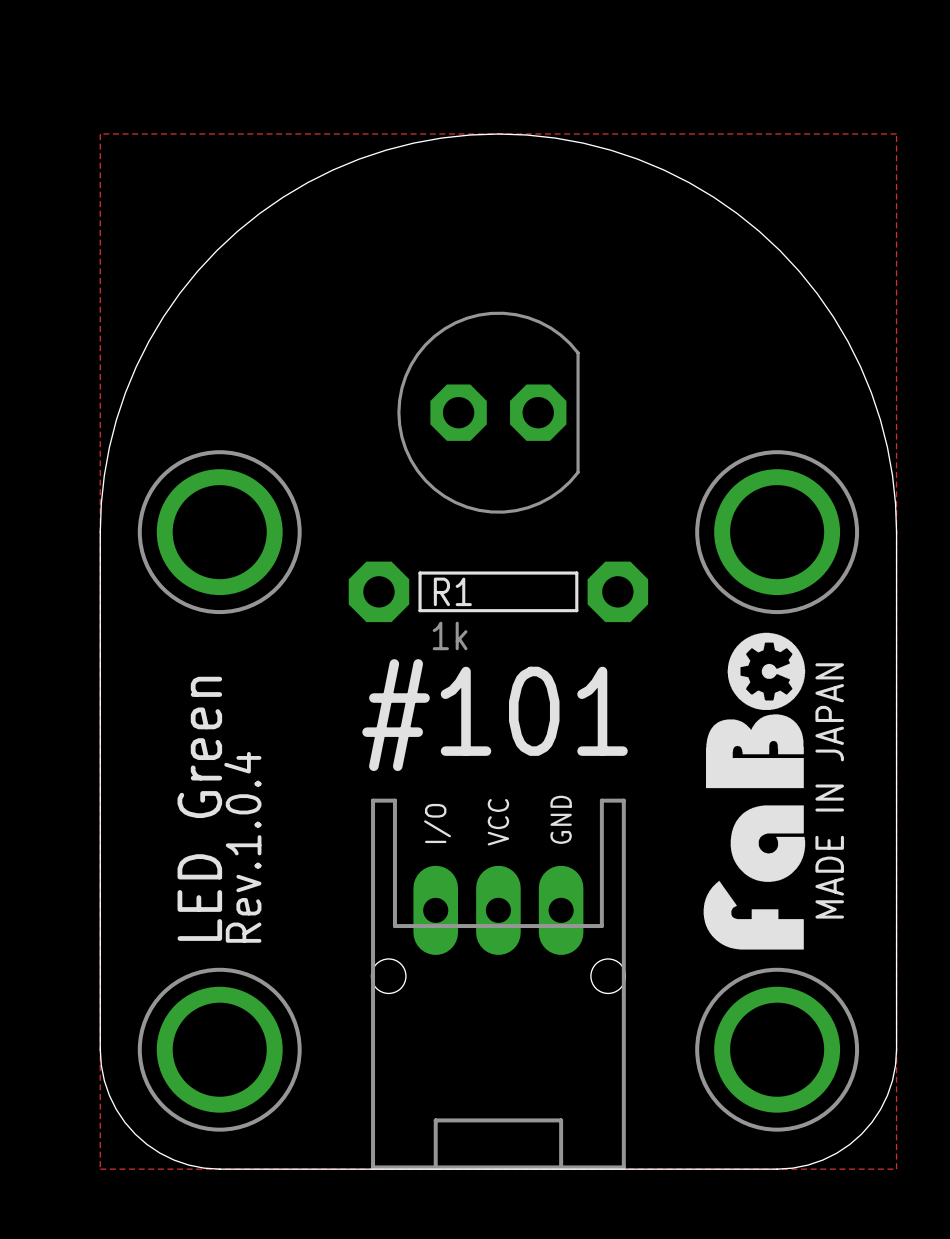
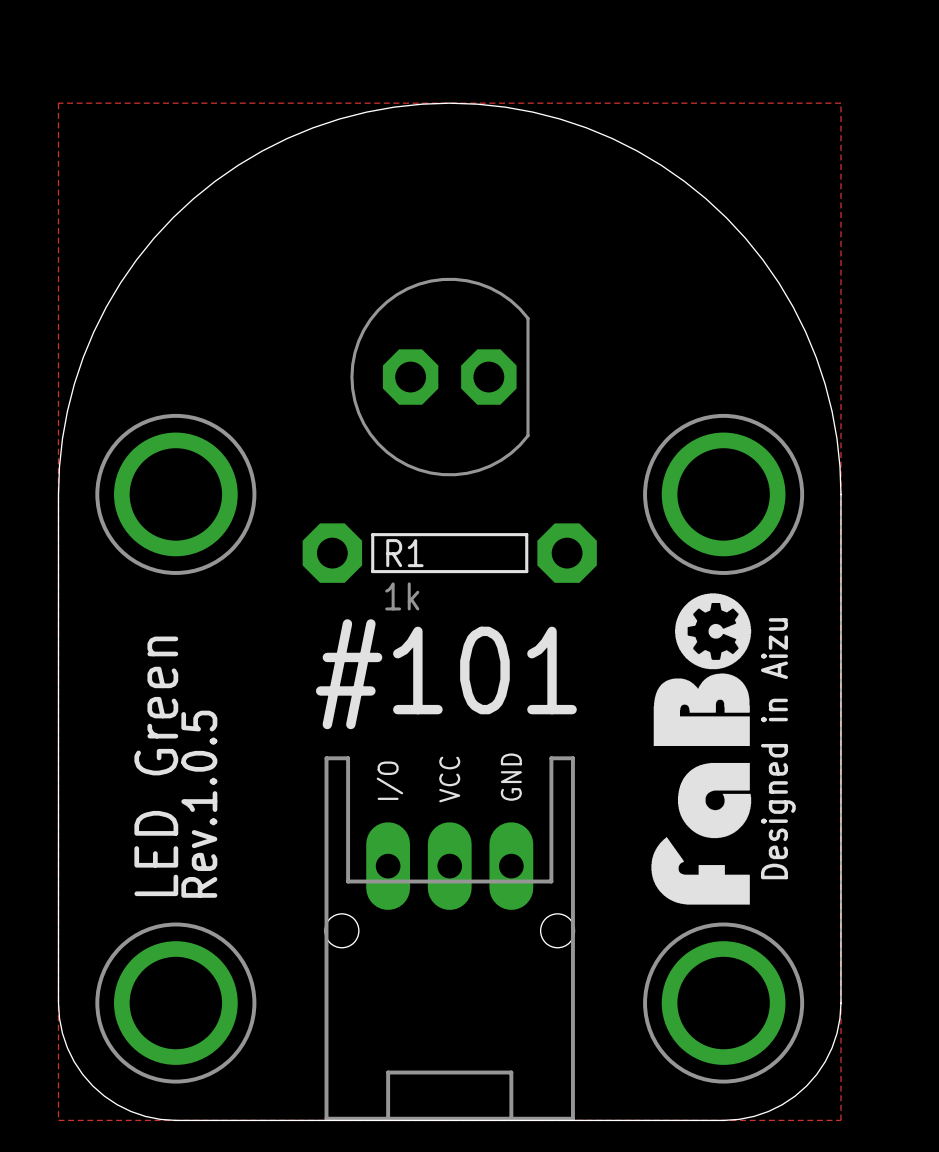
text: MADE IN JAPAN (829, 790) -> Designed in Aizu (778, 748)
text: Rev.1.0.4 (242, 847) -> Rev.1.0.5 (199, 804)

